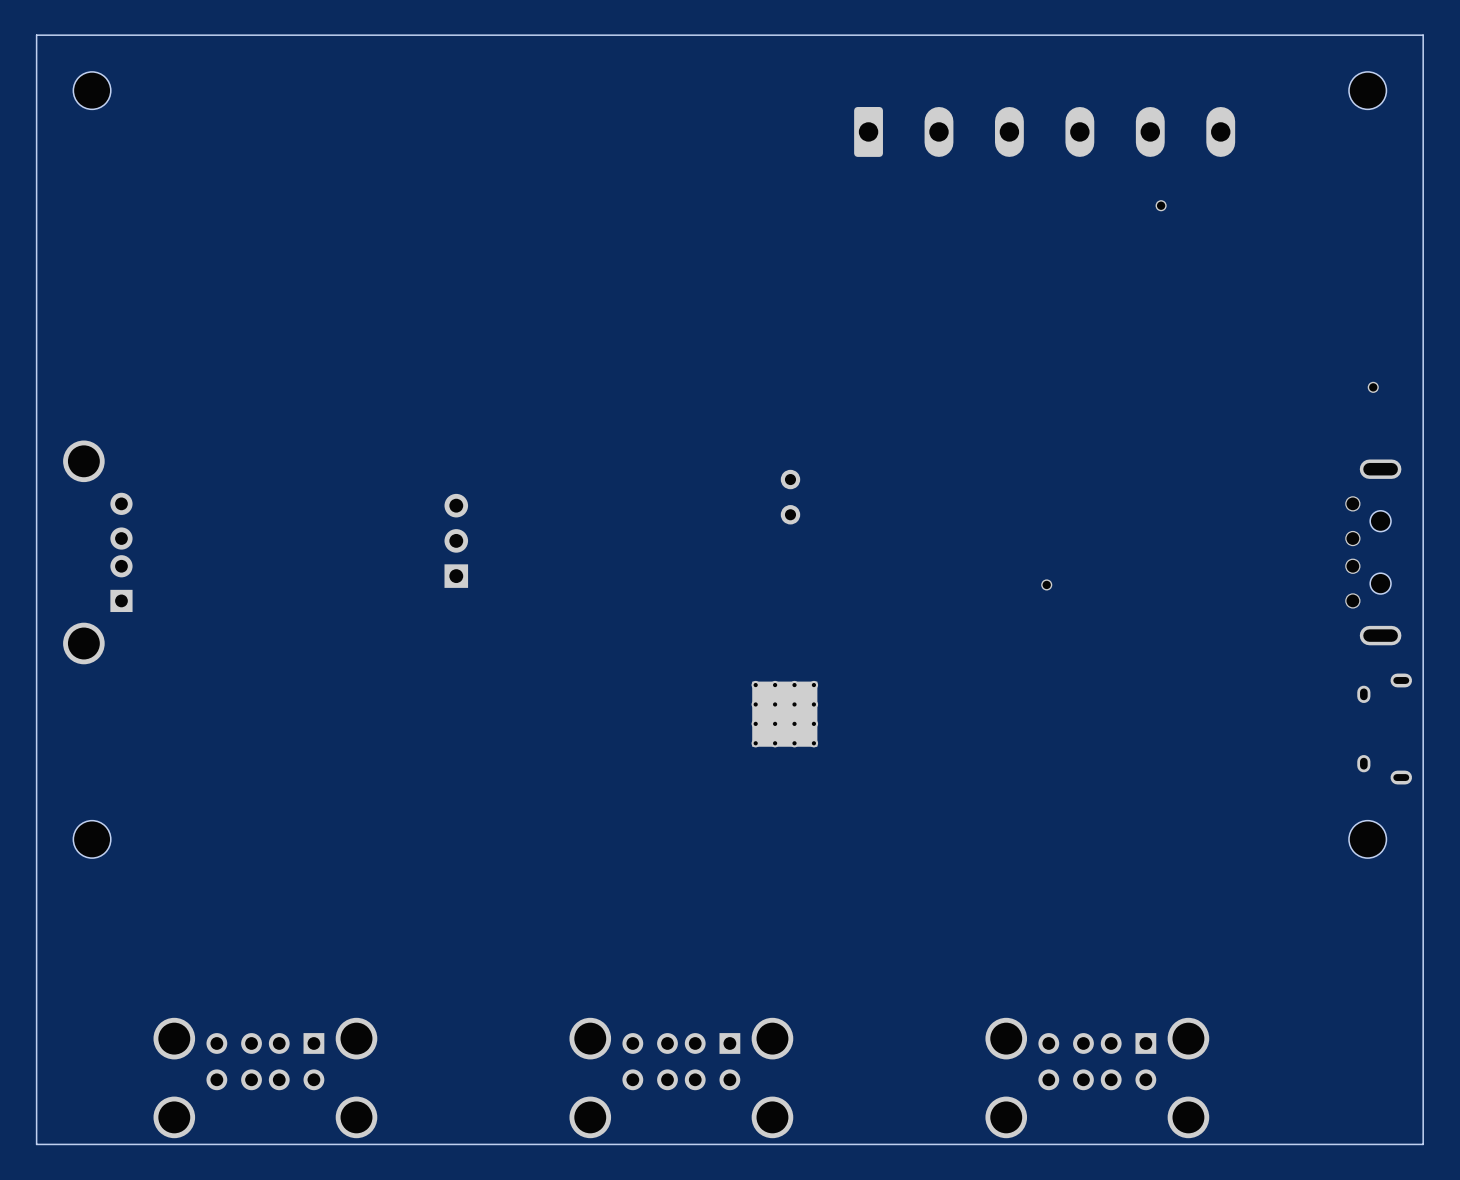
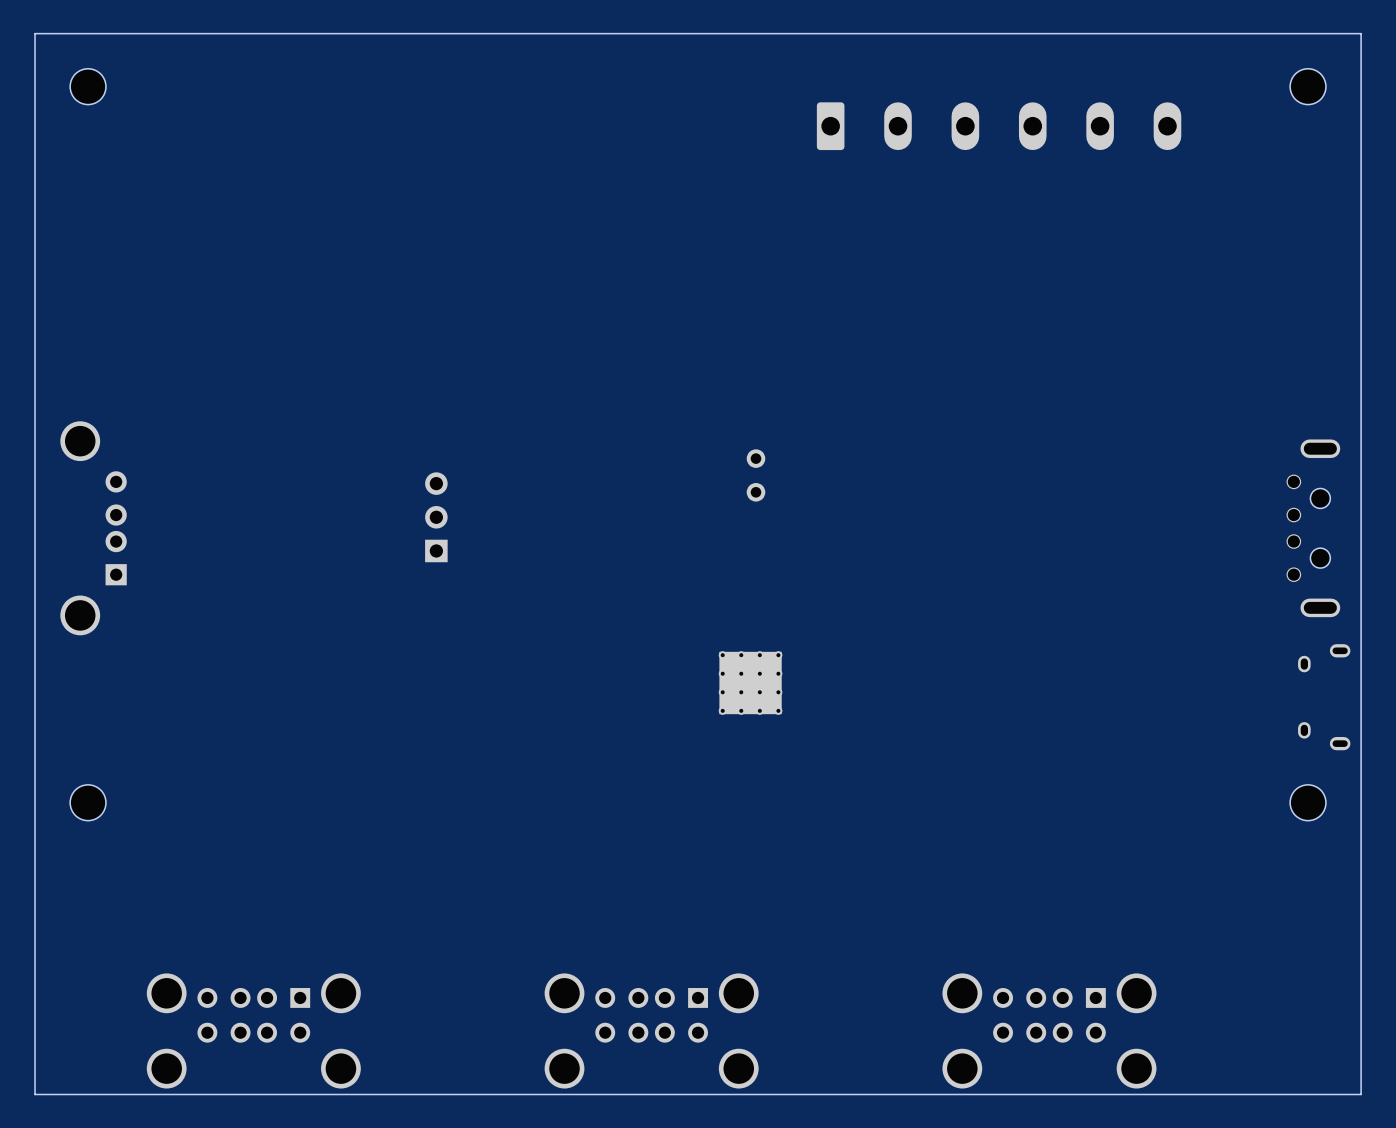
part: (1161, 205) -> none
part: (1373, 387) -> none
part: (1046, 584) -> none

